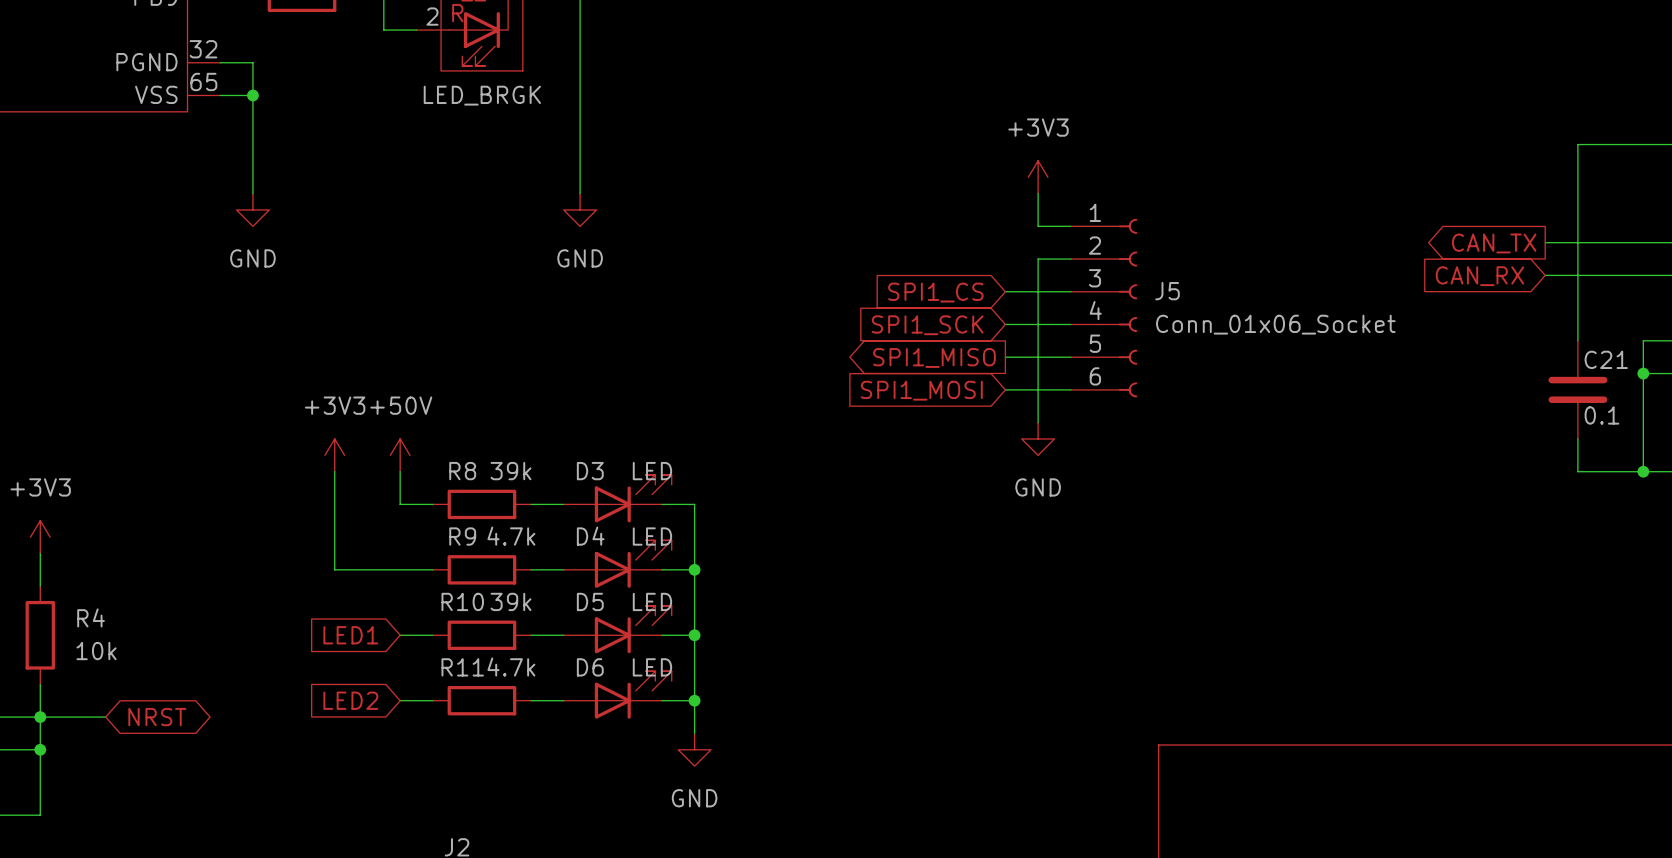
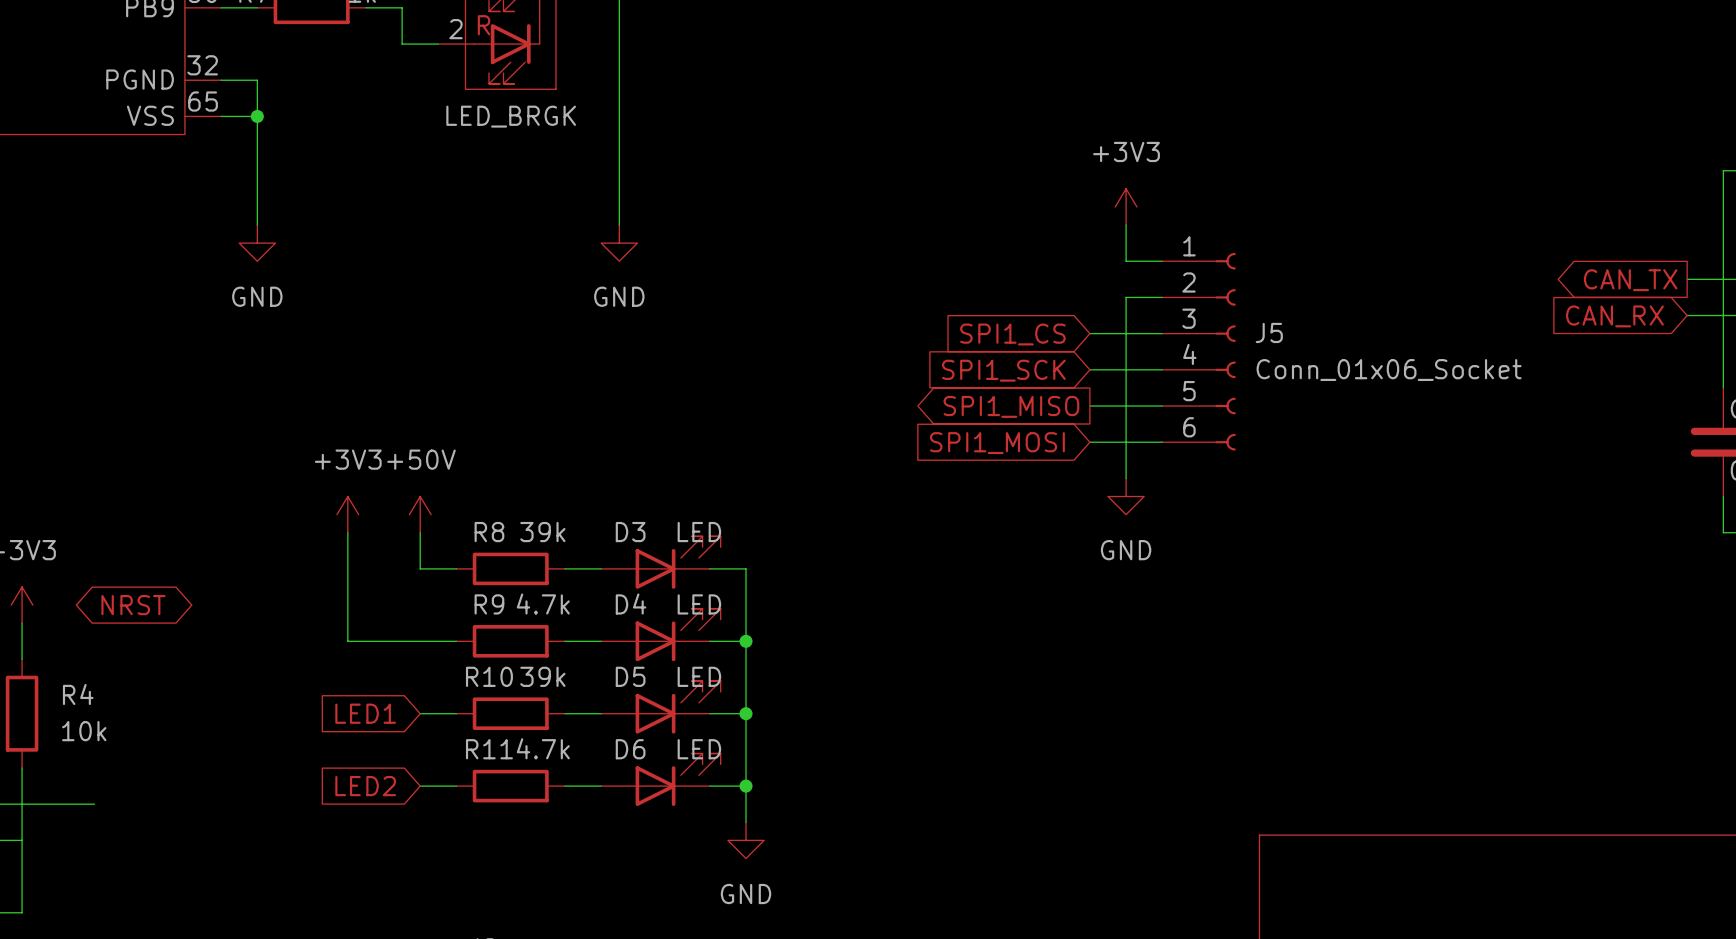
junction: (40, 717) -> none
global label position: NRST (157, 717) -> NRST (133, 605)
junction: (40, 749) -> none

